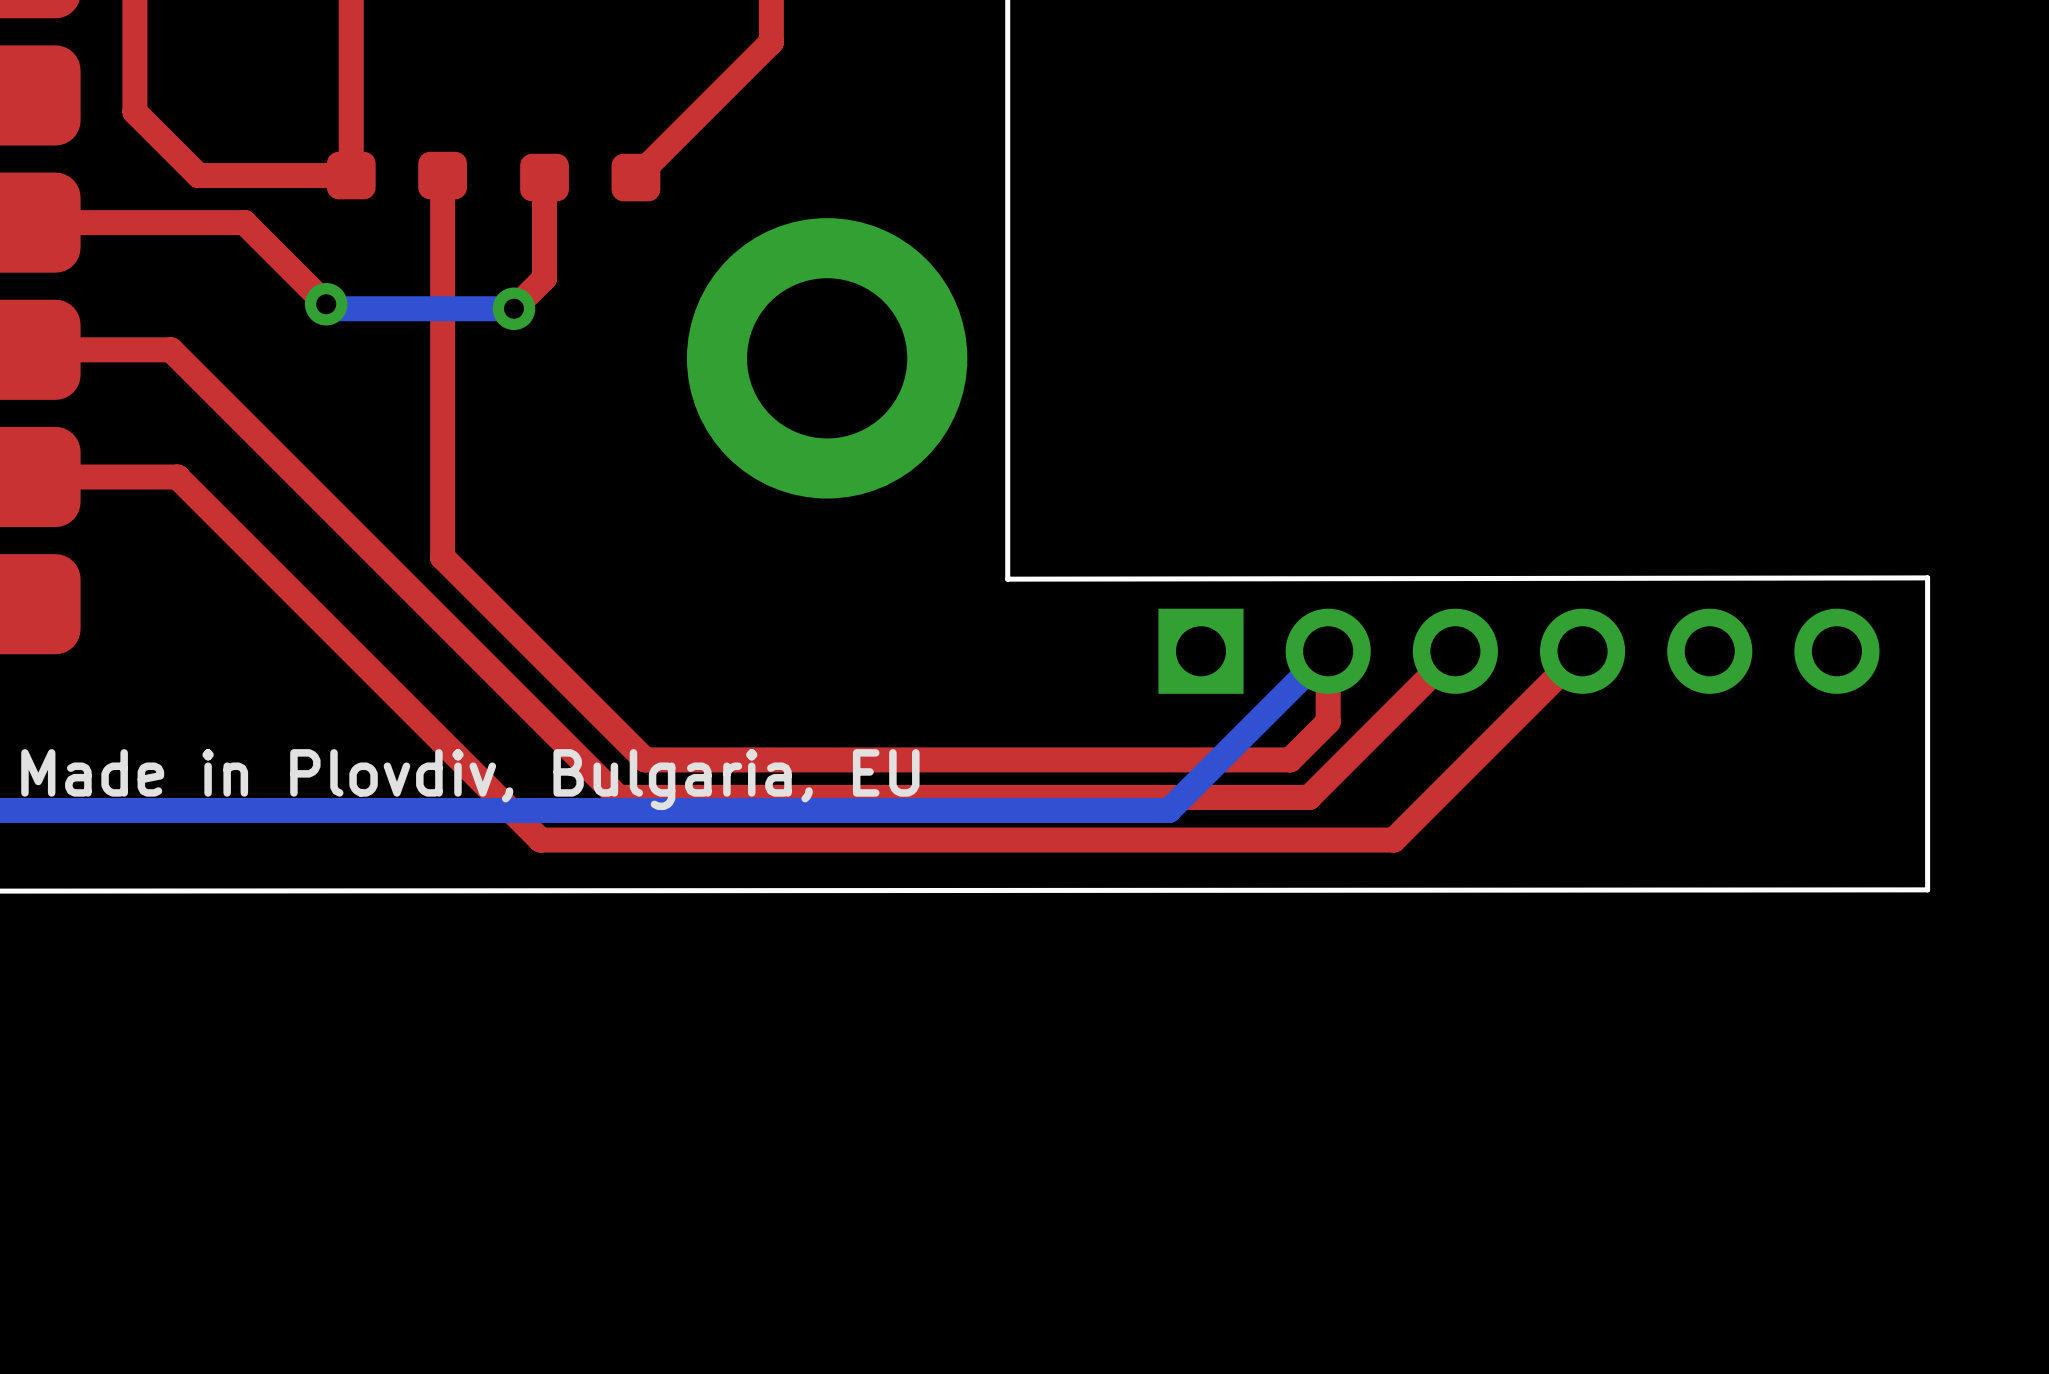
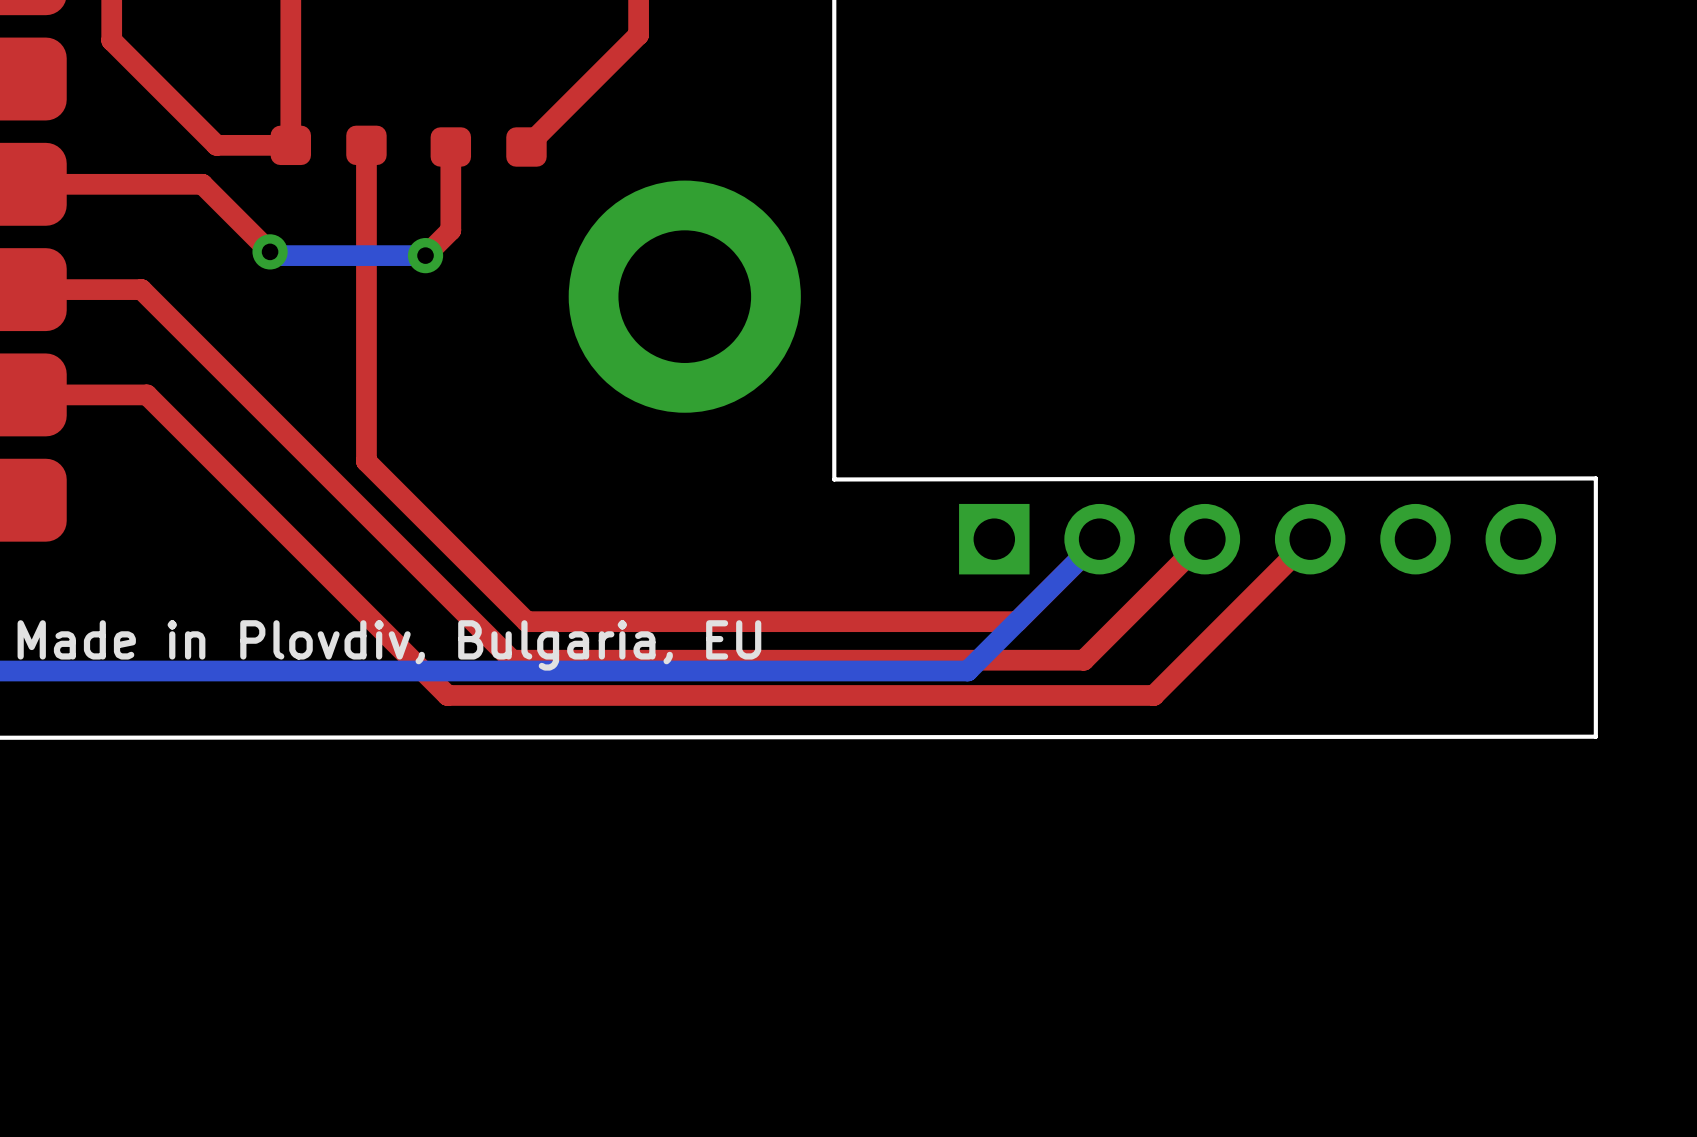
top track: (134, 48) (134, 111) (198, 175) (261, 175) -> (111, 40) (216, 145)
top track: (1328, 651) (1328, 721) (1290, 759) (645, 759) (636, 750) -> (1099, 539) (1017, 621) (526, 621)

